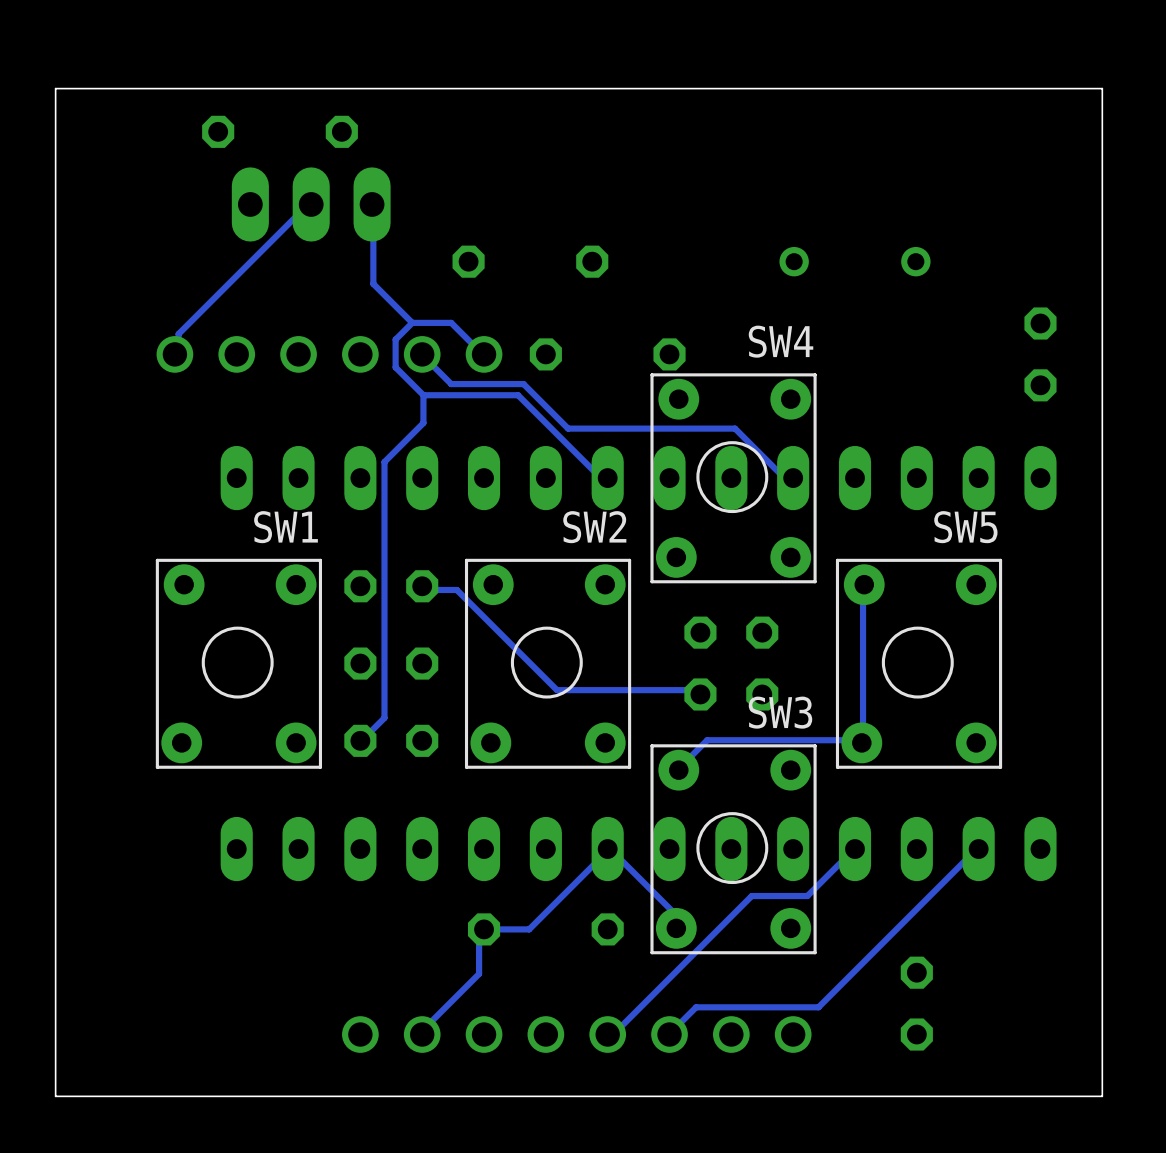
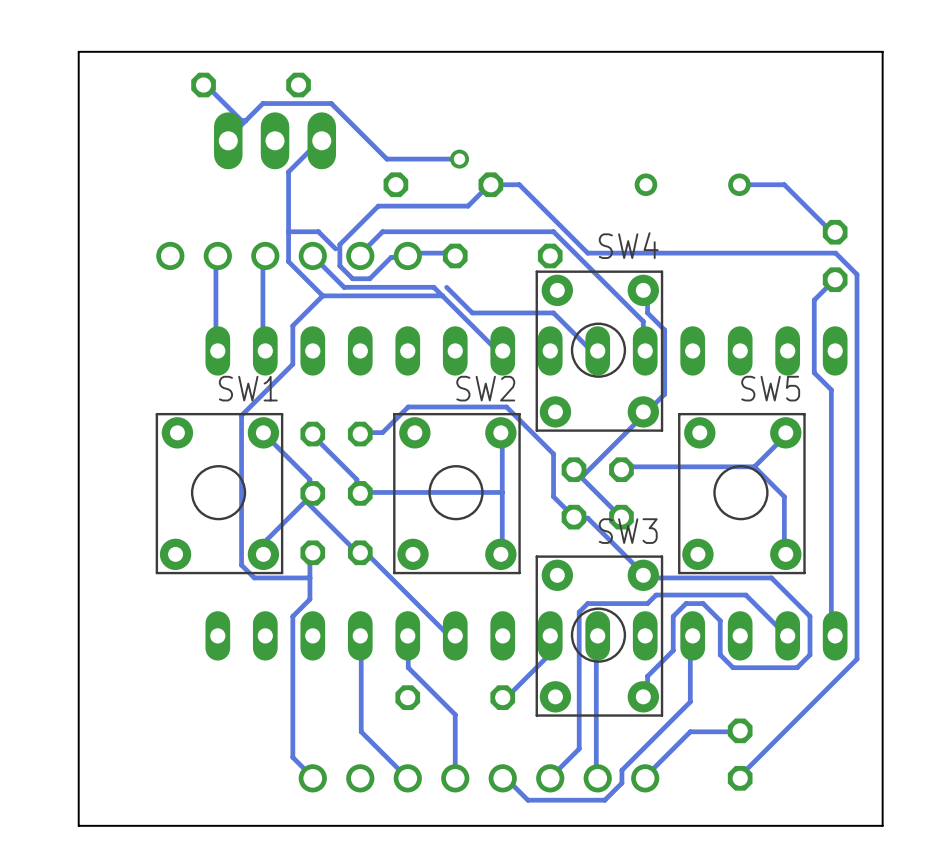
track: none -> (203, 85) (207, 86) (241, 120) (245, 120)
track: none -> (228, 140) (228, 137) (262, 103) (331, 103) (386, 159) (459, 159)
track: (311, 204) (306, 206) (178, 334) (178, 350) (174, 354) -> none
track: (372, 204) (373, 283) (412, 322) (451, 322) (484, 354) -> (321, 140) (288, 171) (288, 261) (322, 295)
via: none -> (459, 159)
track: none -> (739, 184) (784, 184) (831, 231) (835, 232)
track: none -> (288, 231) (318, 231) (335, 248)
track: none -> (352, 231) (378, 206) (468, 206) (489, 184) (519, 184) (587, 253) (835, 253) (857, 274) (857, 659) (741, 774) (740, 778)
track: none -> (217, 255) (215, 257) (215, 347) (217, 350)
track: none -> (265, 255) (262, 257) (262, 347) (265, 350)
track: none -> (312, 255) (344, 287) (361, 287)
track: (422, 354) (451, 384) (523, 384) (534, 395) -> (360, 255) (382, 231) (553, 231) (643, 321) (643, 347)
track: (412, 384) (423, 395) (423, 423) (384, 461) (384, 717) (360, 740) -> (352, 278) (369, 278) (391, 257) (403, 257) (407, 255) (408, 253) (455, 253) (455, 255)
track: none -> (835, 279) (814, 300) (814, 372) (831, 389) (831, 633) (835, 635)
track: none -> (643, 290) (647, 291) (647, 312) (664, 330) (664, 394) (647, 411) (643, 411) (643, 415) (583, 475) (579, 475) (573, 469) (574, 471) (617, 513) (621, 517)
track: none -> (322, 295) (292, 325) (292, 364) (241, 415) (241, 565) (254, 577) (309, 577)
track: none -> (442, 295) (322, 295)
track: (673, 428) (735, 428) (779, 473) (790, 473) -> (553, 312) (587, 347) (596, 347) (597, 350)
track: none -> (263, 432) (309, 479) (309, 492) (312, 493)
track: none -> (500, 432) (500, 554)
track: (864, 584) (861, 742) (857, 740) (707, 740) (678, 770) -> none
track: none -> (785, 432) (784, 436) (754, 466)
track: none -> (312, 434) (356, 479) (356, 492) (502, 492)
track: (422, 586) (423, 589) (456, 589) (556, 690) (696, 690) -> (360, 434) (382, 432) (408, 406) (506, 406) (553, 454) (553, 496) (570, 513)
track: none -> (754, 466) (621, 466) (621, 469)
track: none -> (754, 466) (784, 496) (785, 554)
track: none -> (312, 493) (267, 539) (267, 552) (263, 554)
track: none -> (312, 493) (305, 501) (356, 552) (360, 552) (361, 556) (369, 556) (446, 633) (455, 633) (455, 635)
track: none -> (573, 517) (587, 518) (647, 577) (771, 577) (809, 616) (809, 654) (797, 667) (733, 667) (720, 654) (720, 620) (703, 603) (686, 603) (673, 616) (673, 650) (647, 676) (647, 693) (643, 696)
track: none -> (312, 552) (309, 556) (309, 599) (292, 616) (292, 757) (312, 778)
track: none -> (360, 635) (361, 731) (407, 778)
track: none -> (407, 635) (408, 667) (455, 714) (455, 778)
track: none -> (550, 635) (549, 654) (506, 697) (502, 697)
track: none -> (597, 635) (597, 778)
track: (978, 849) (851, 973) -> (740, 730) (690, 731)
track: none -> (787, 635) (745, 595) (656, 595) (647, 603) (587, 603) (579, 612) (579, 748) (570, 757)
track: (851, 851) (807, 896) (751, 896) (612, 1035) -> (690, 637) (690, 701) (621, 770) (621, 783) (604, 800) (527, 800) (506, 778)
track: (676, 928) (673, 923) (673, 912) (612, 851) (607, 849) (529, 929) (479, 929) (479, 973) (423, 1029) (422, 1034) -> none
track: (818, 1007) (696, 1007) -> (664, 757) (645, 778)

